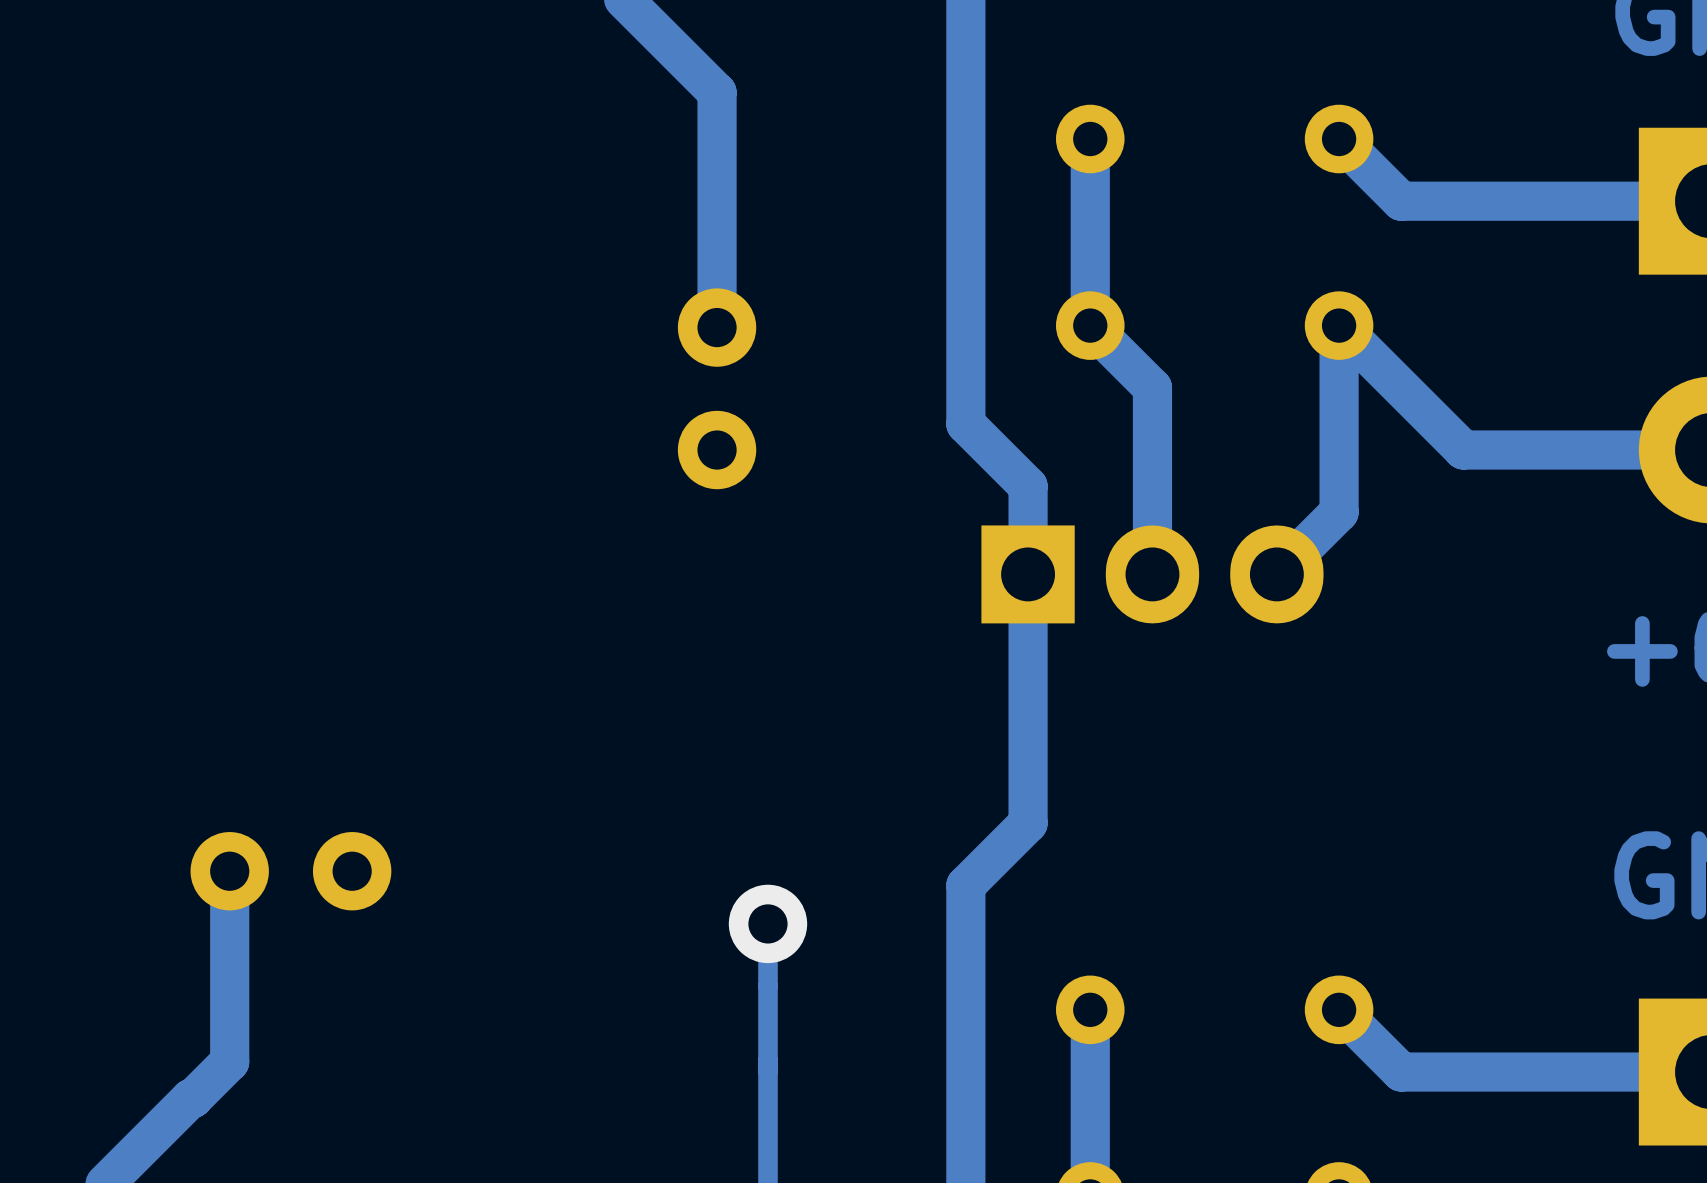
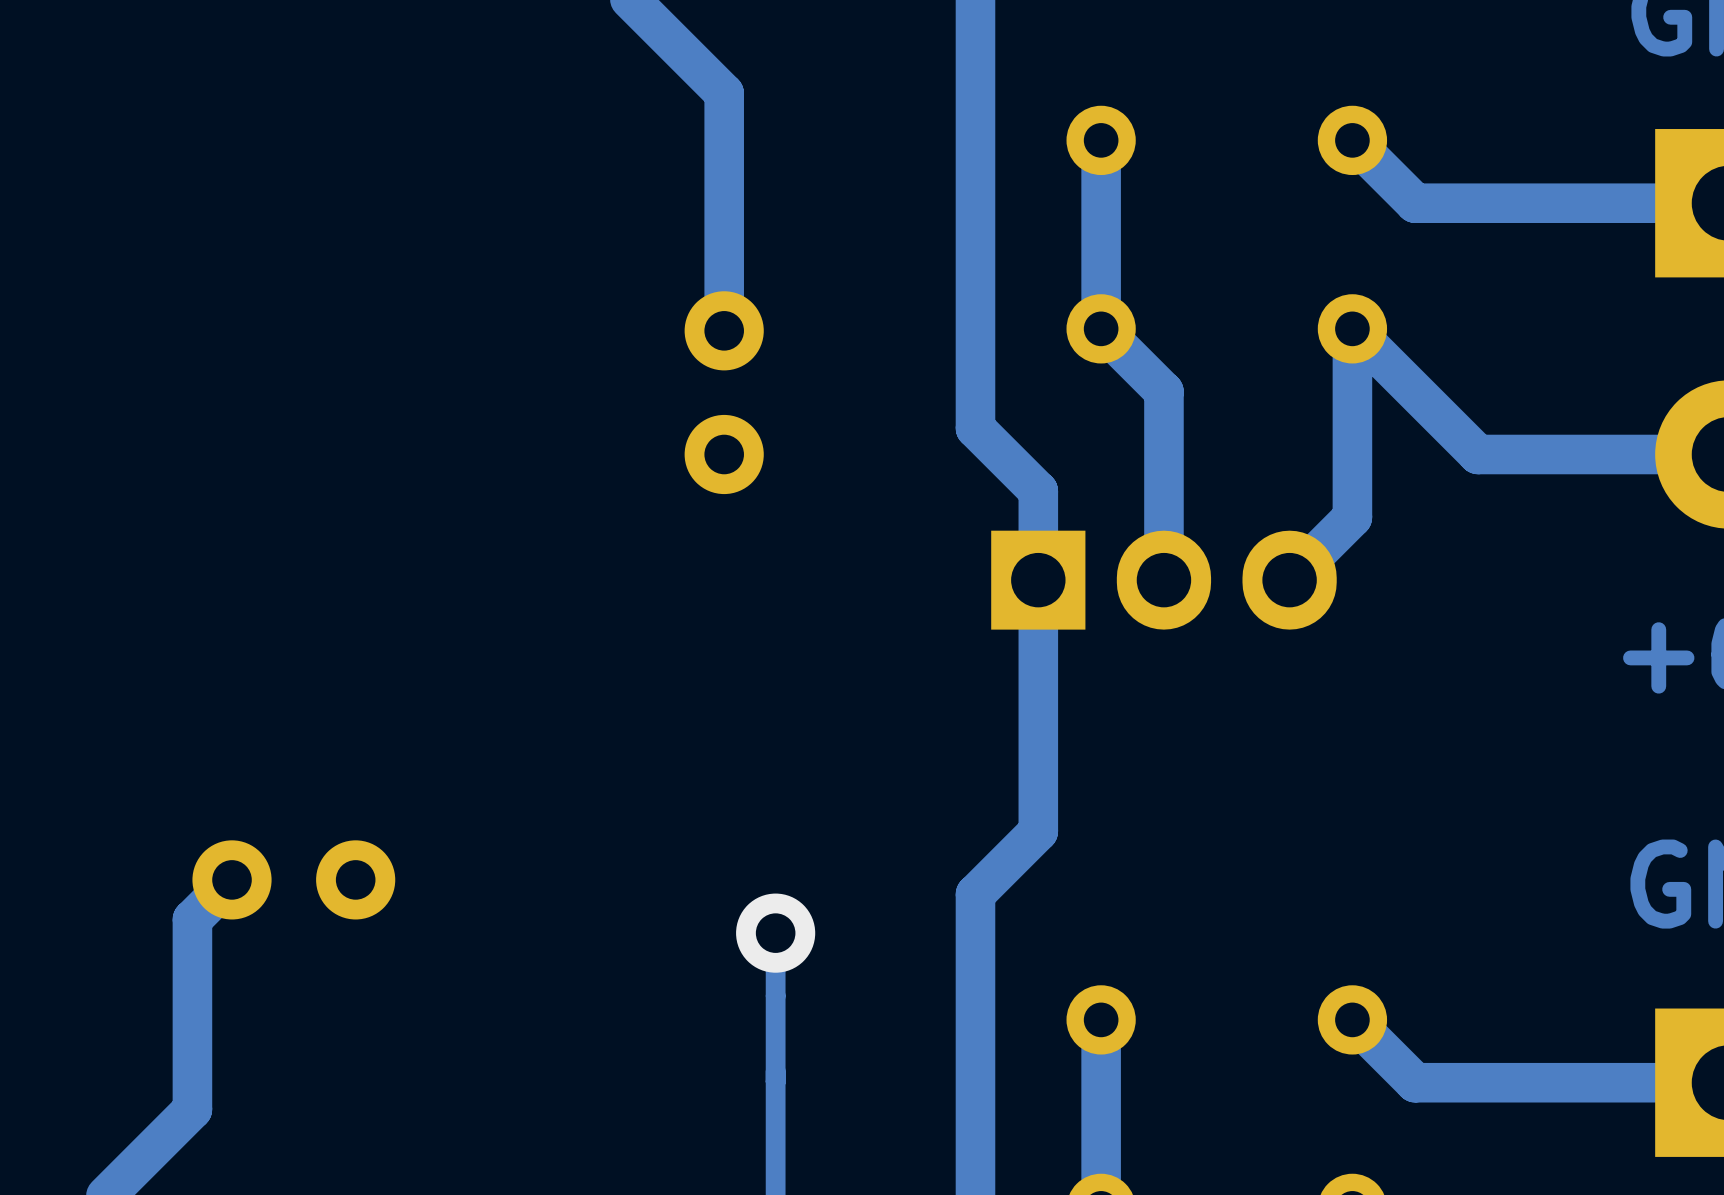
track: (229, 871) (229, 1061) (192, 1098) (190, 1098) -> (232, 879) (192, 919) (192, 1109)

